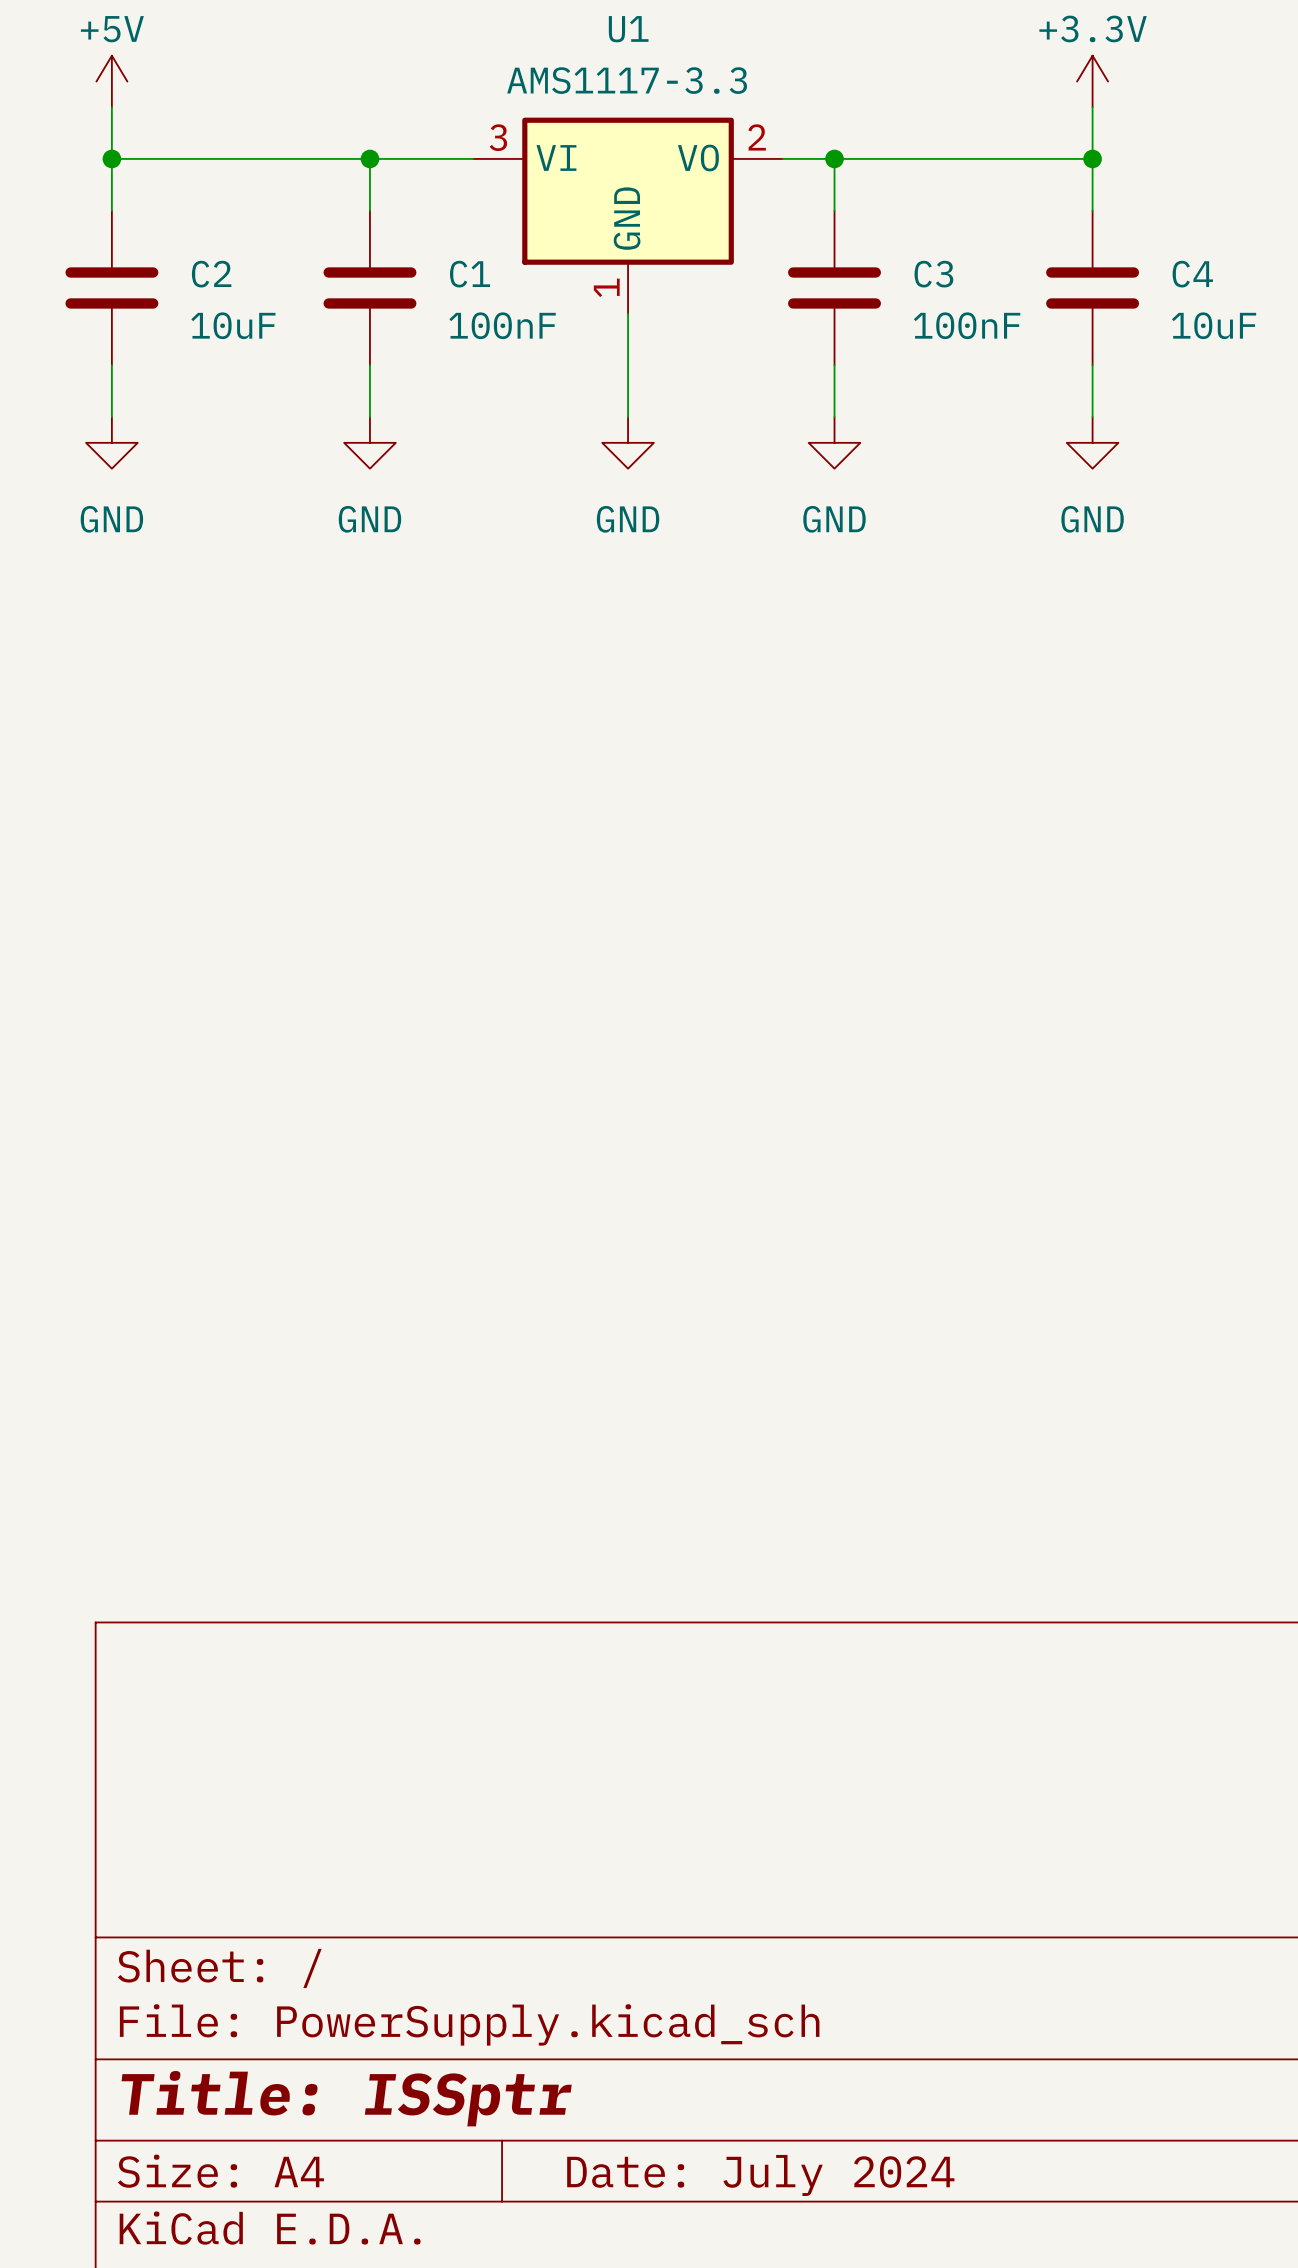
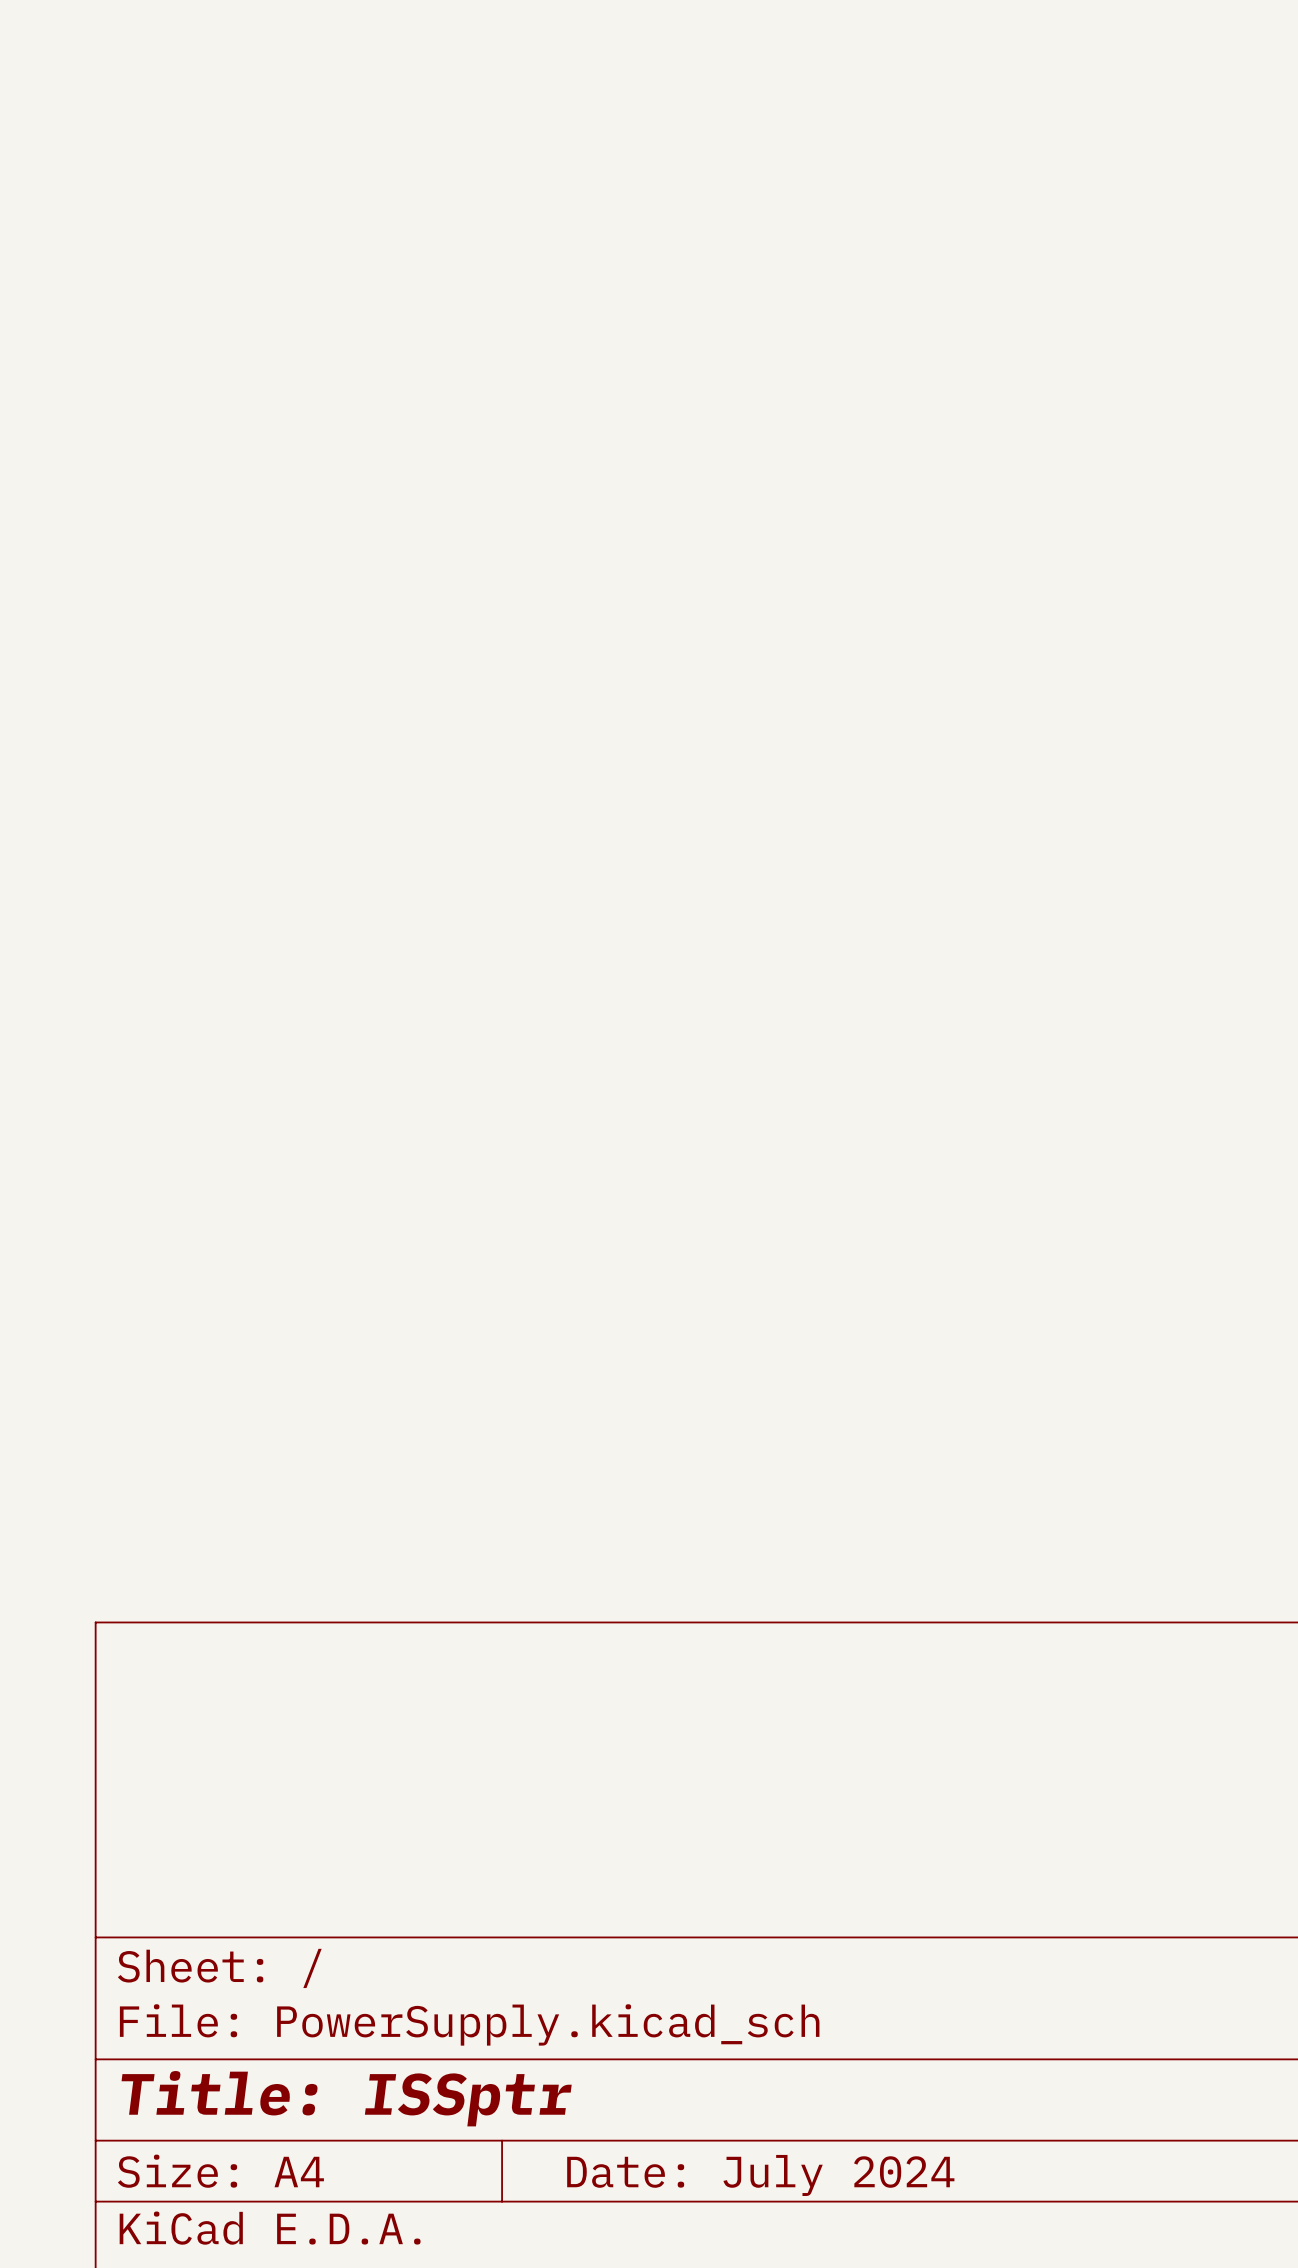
power symbol: +5V (111, 81) -> none
power symbol: +3.3V (1092, 81) -> none
wire: (111, 107) (111, 210) -> none
wire: (1092, 107) (1092, 210) -> none
wire: (111, 158) (473, 158) -> none
junction: (111, 158) -> none
wire: (369, 158) (369, 210) -> none
junction: (369, 158) -> none
wire: (782, 158) (1092, 158) -> none
wire: (834, 158) (834, 210) -> none
junction: (834, 158) -> none
junction: (1092, 158) -> none
U1: AMS1117-3.3 (628, 215) -> none
C2: 10uF (111, 287) -> none
C1: 100nF (369, 287) -> none
C3: 100nF (834, 287) -> none
C4: 10uF (1092, 287) -> none
wire: (628, 313) (628, 417) -> none
wire: (111, 365) (111, 417) -> none
wire: (369, 365) (369, 417) -> none
wire: (834, 365) (834, 417) -> none
wire: (1092, 365) (1092, 417) -> none
power symbol: GND (111, 442) -> none
power symbol: GND (369, 442) -> none
power symbol: GND (628, 442) -> none
power symbol: GND (834, 442) -> none
power symbol: GND (1092, 442) -> none

